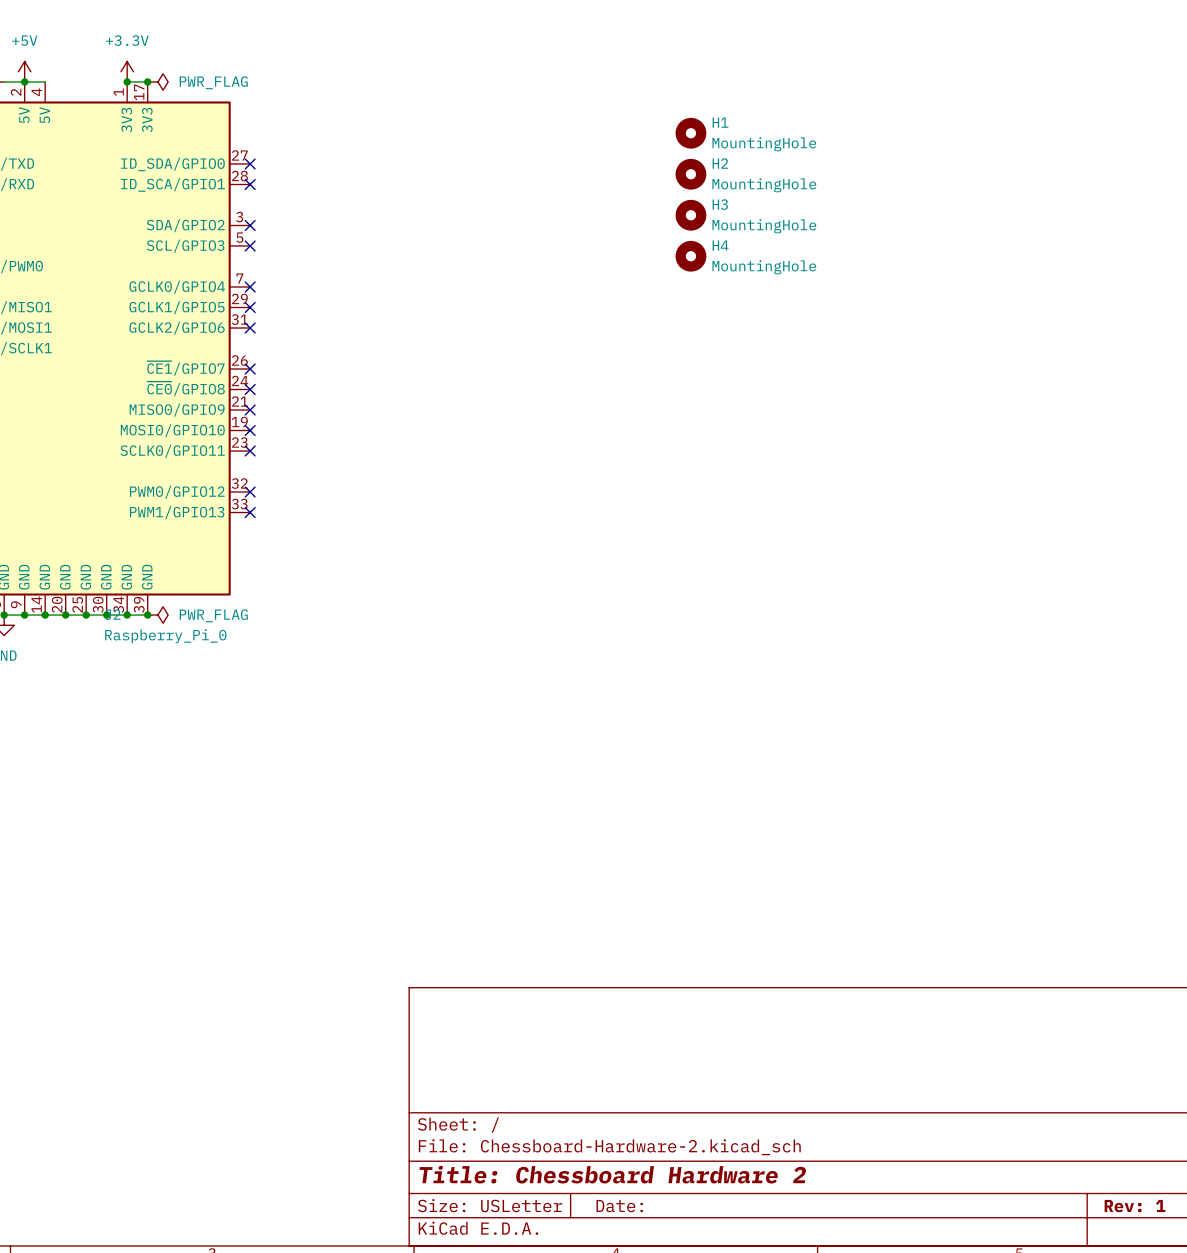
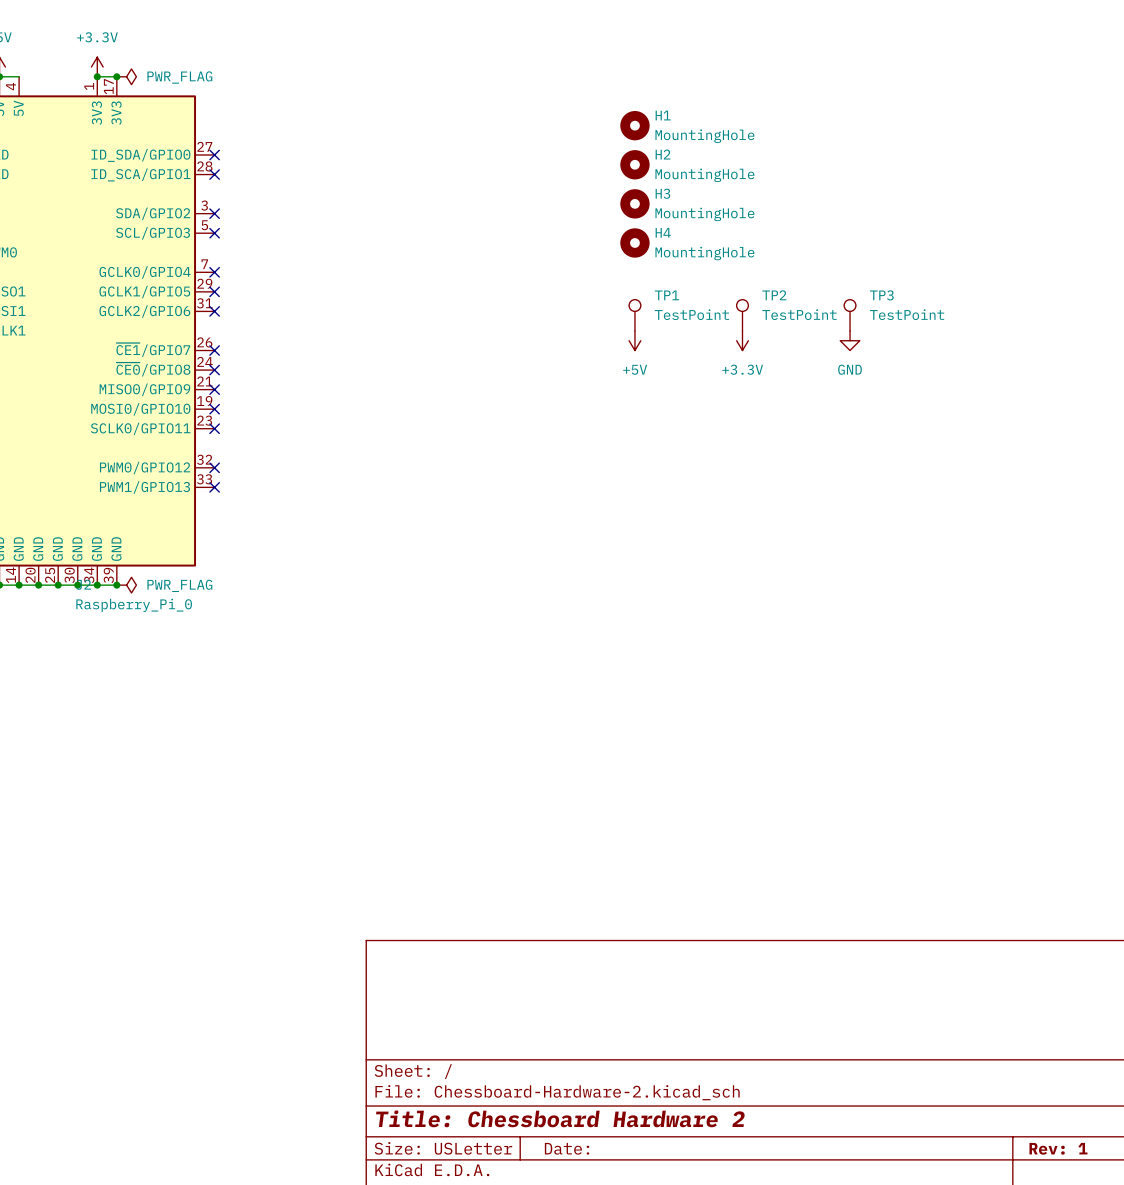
TP1: none -> TestPoint (634, 315)
TP2: none -> TestPoint (742, 315)
TP3: none -> TestPoint (850, 315)
power symbol: none -> +5V (634, 340)
power symbol: none -> +3.3V (742, 340)
power symbol: none -> GND (850, 340)

